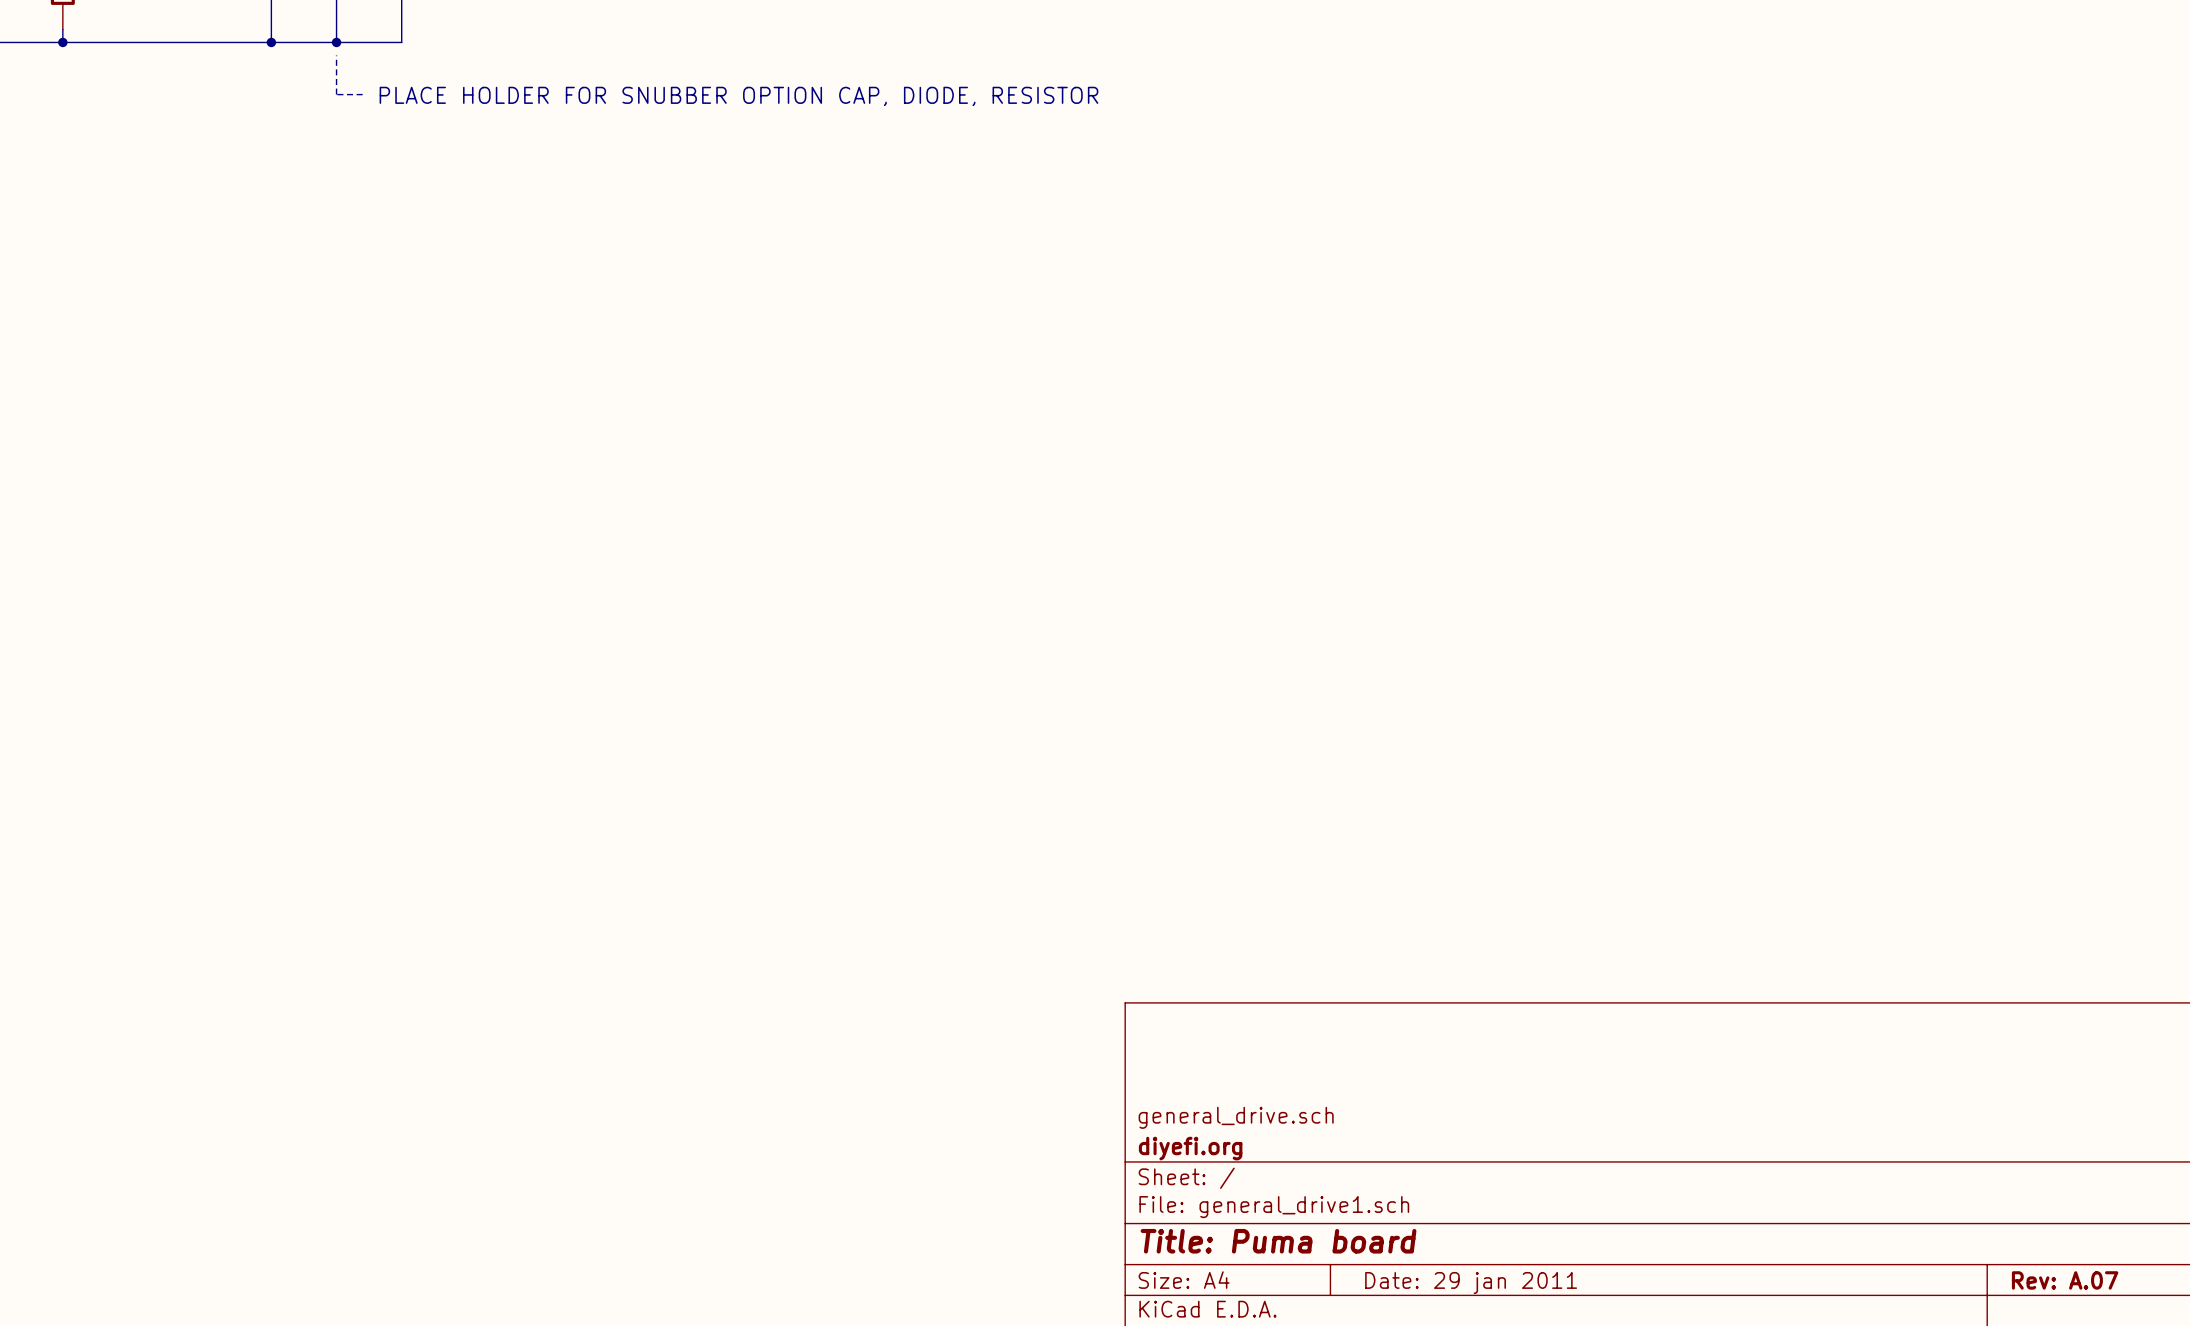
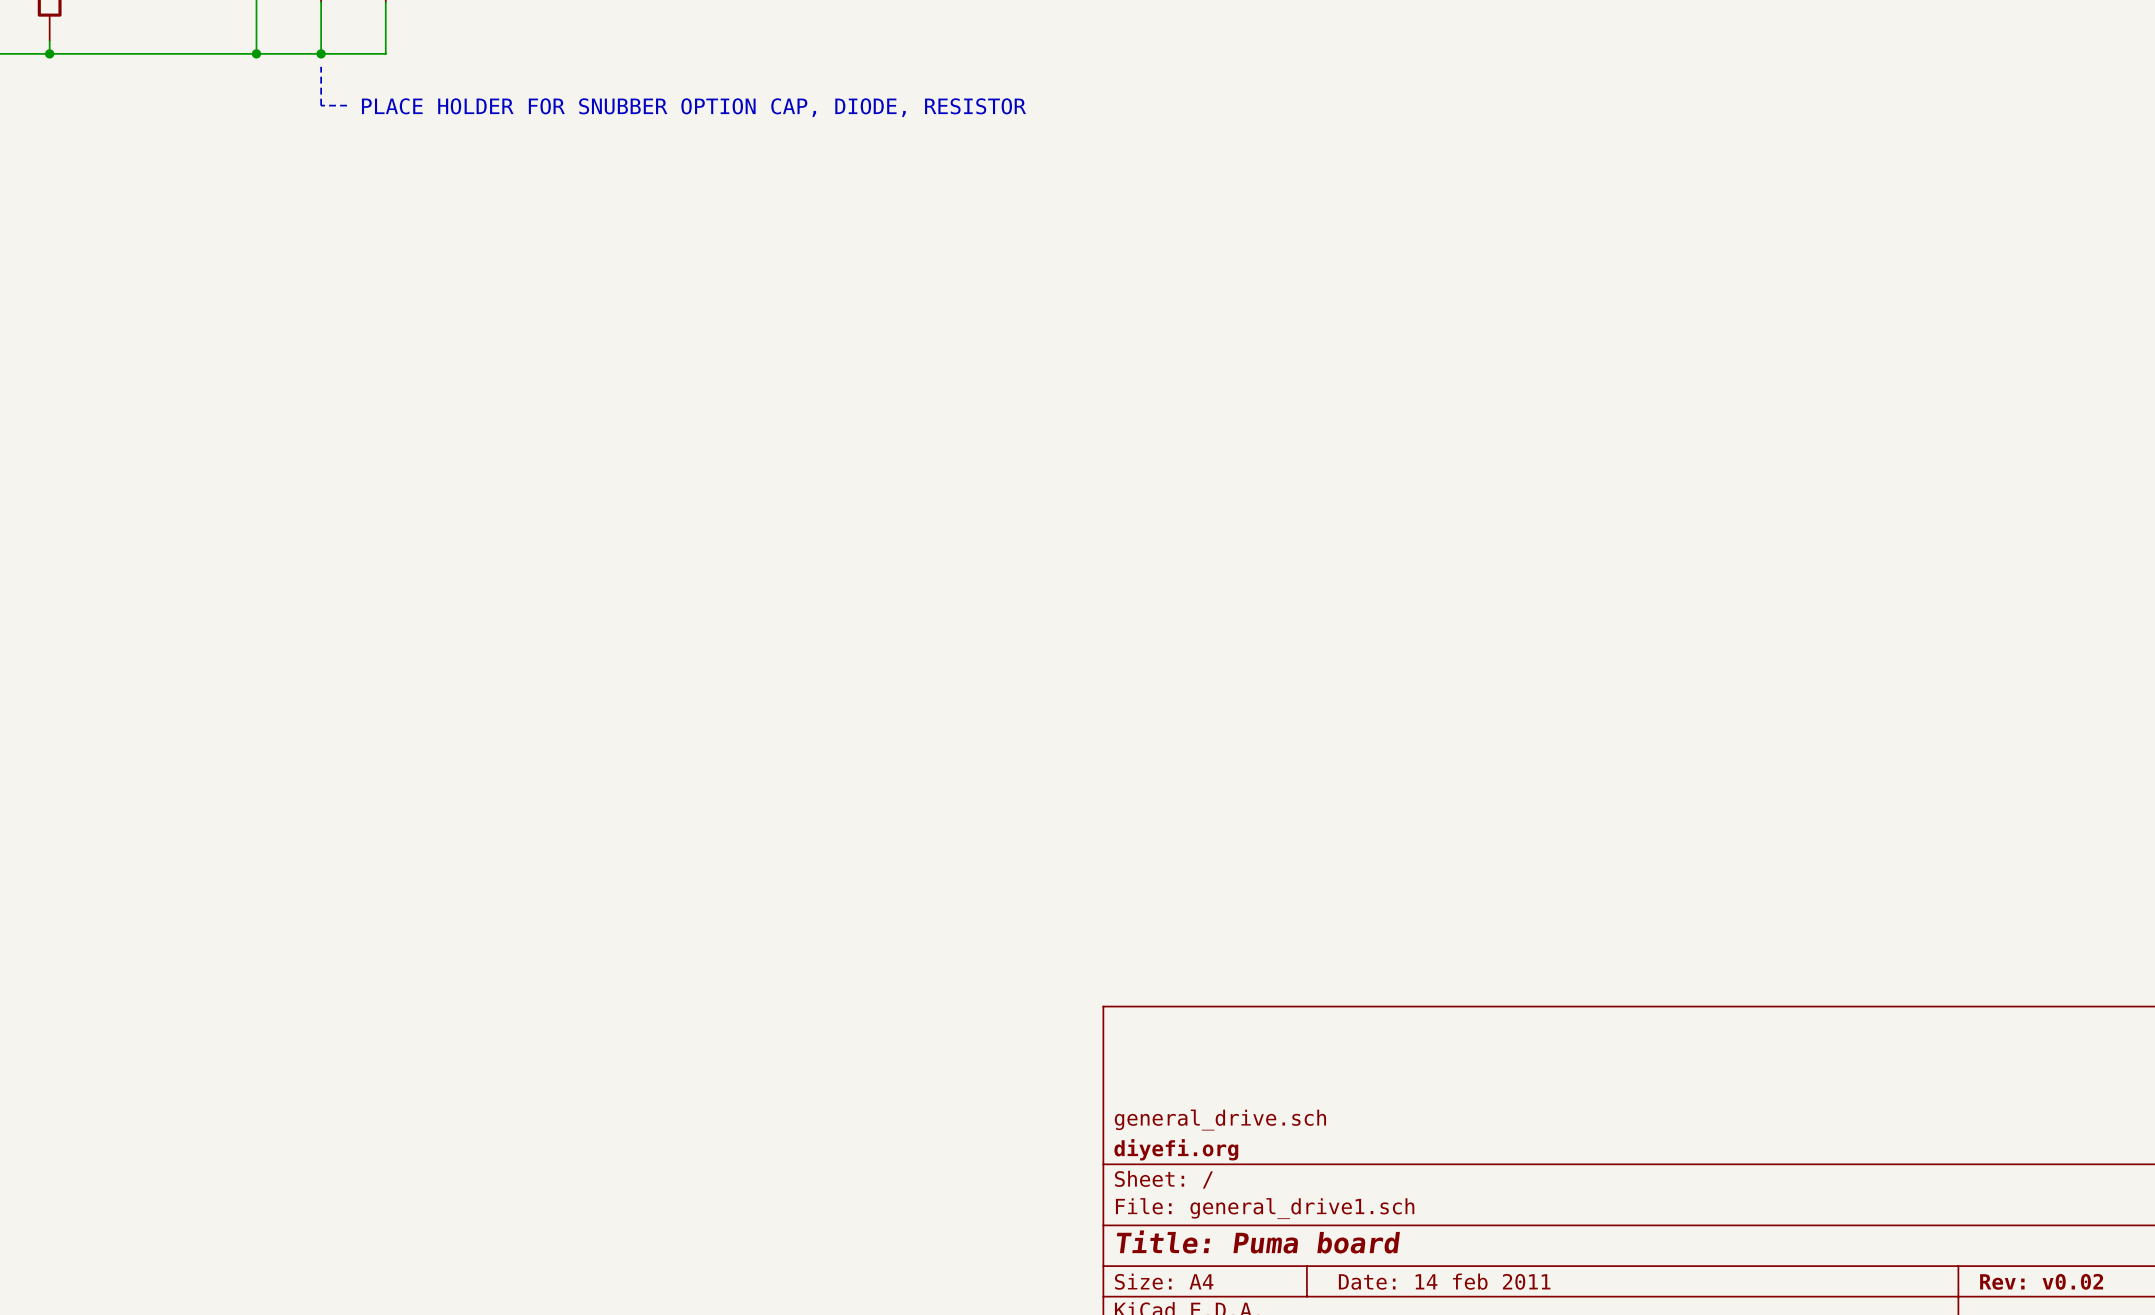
title block: Rev: A.07 (2065, 1280) -> Rev: v0.02 (2041, 1281)
title block: Date: 29 jan 2011 (1471, 1283) -> Date: 14 feb 2011 (1444, 1281)

